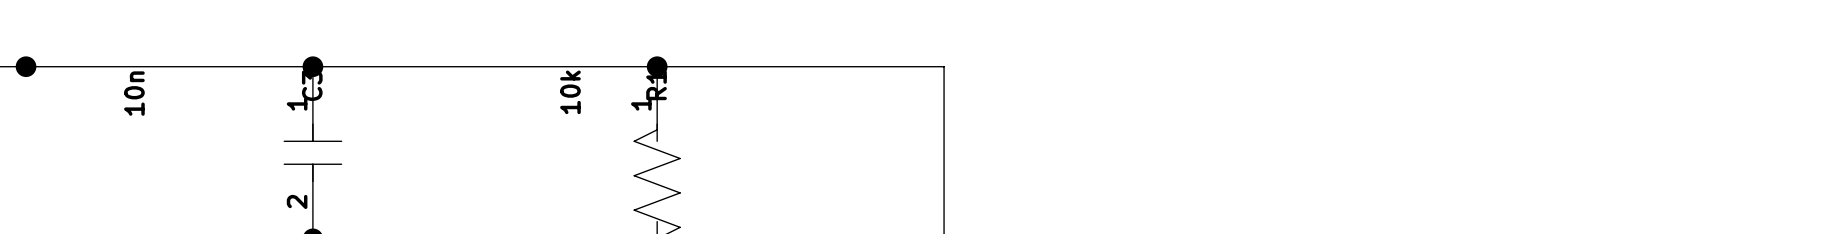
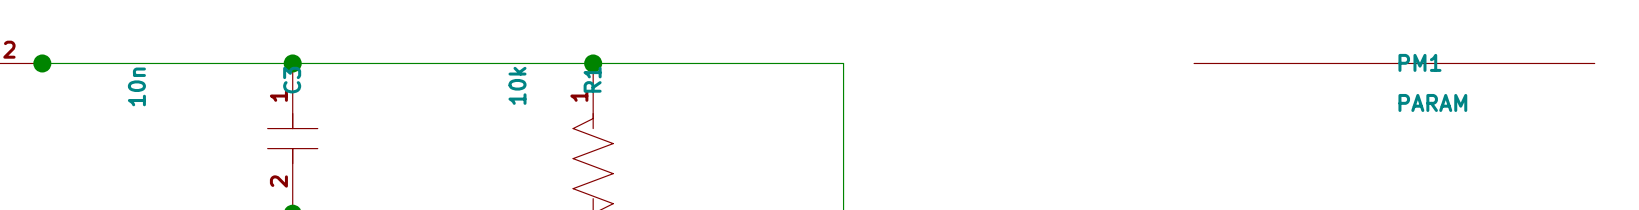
PM1: none -> PARAM (1394, 63)

